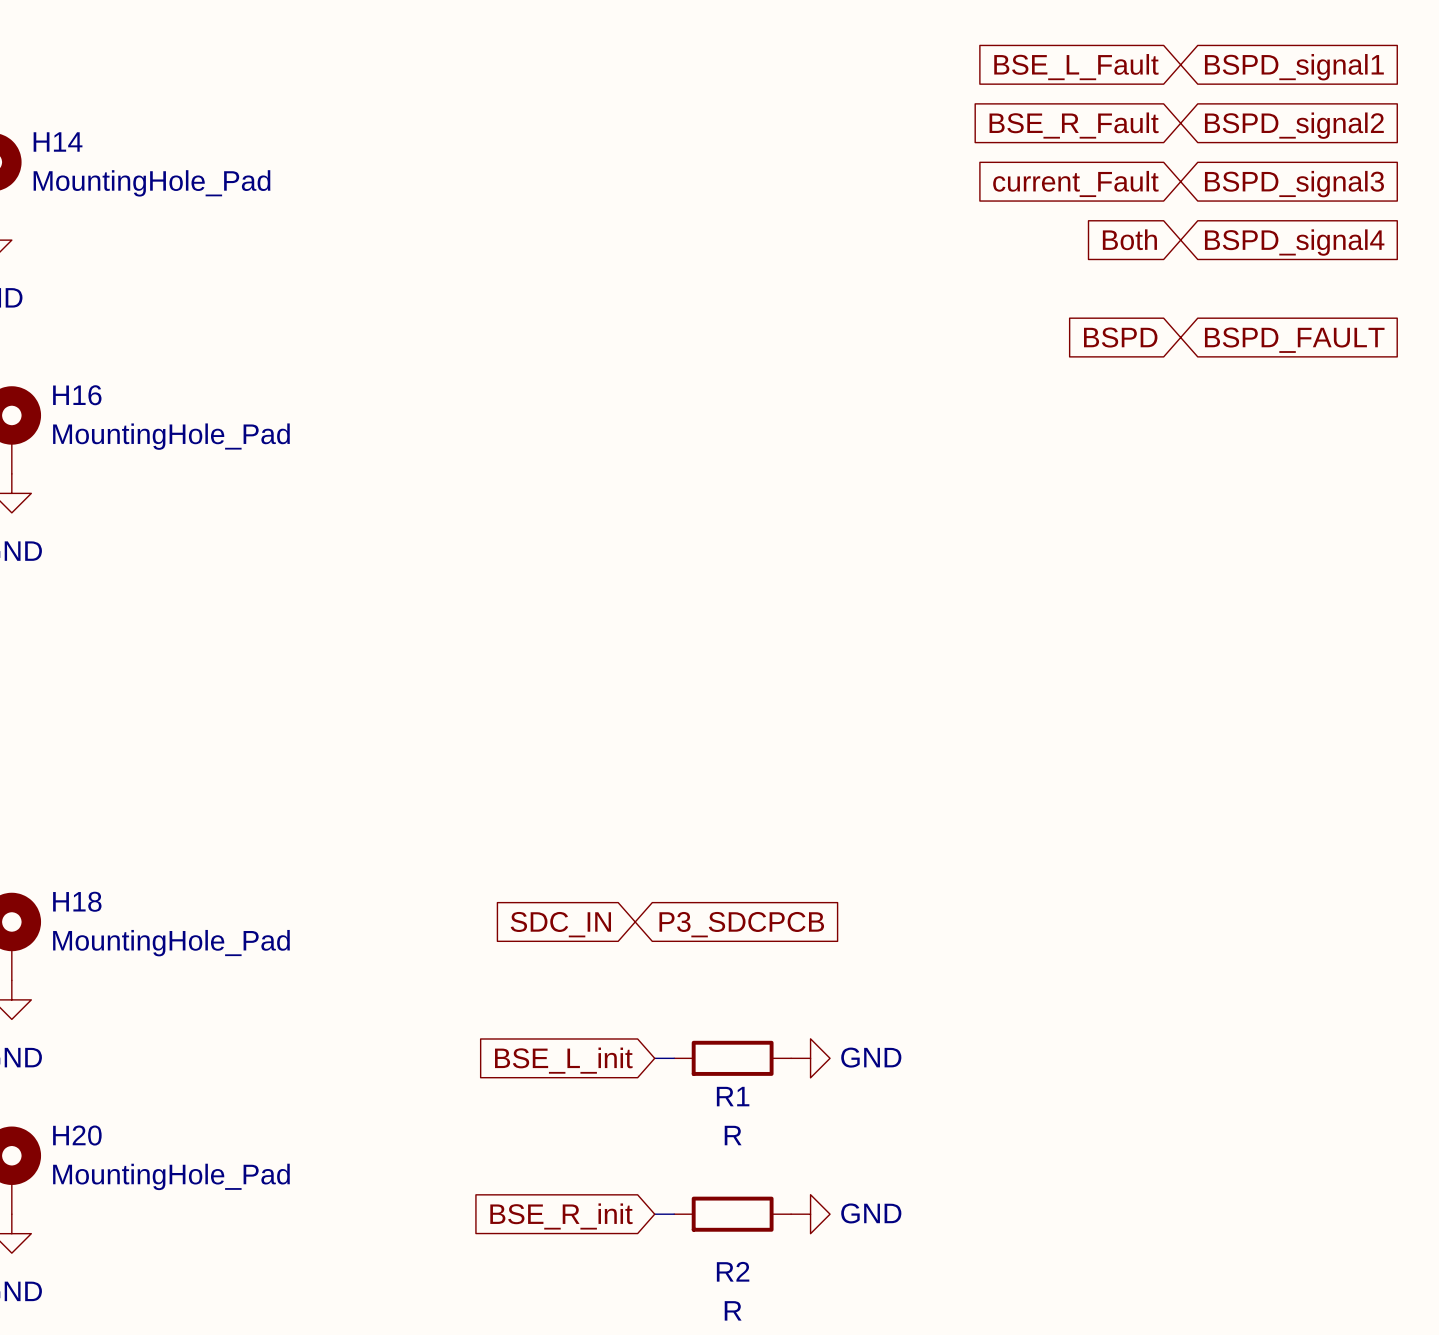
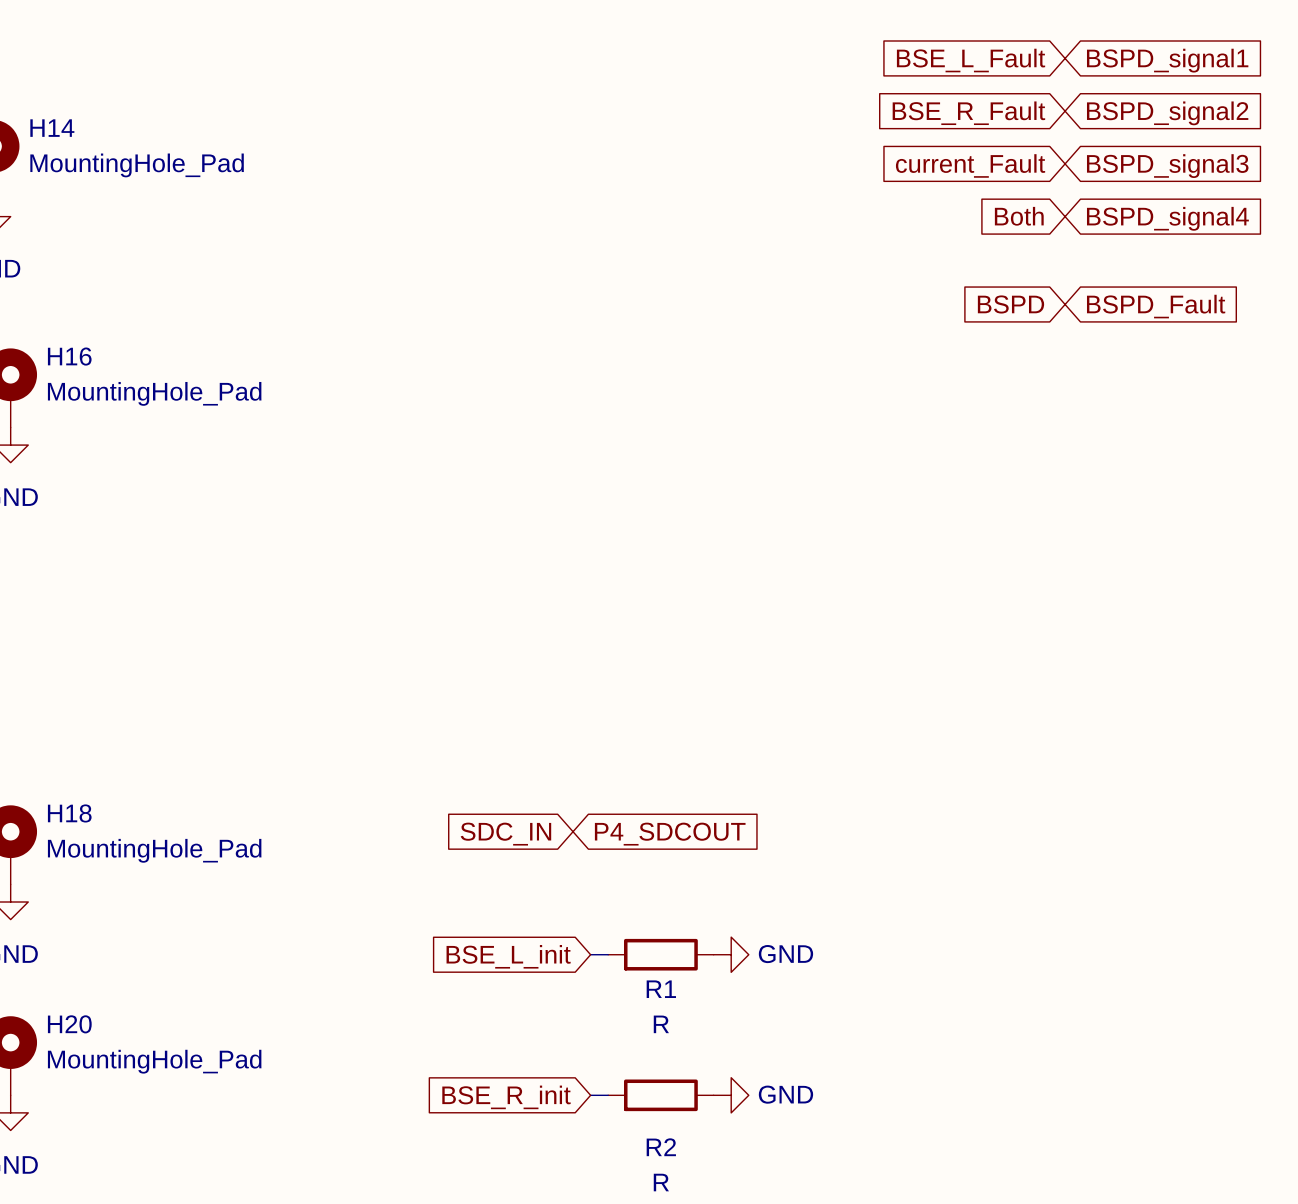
global label: BSPD_FAULT (1294, 340) -> BSPD_Fault (1156, 306)
global label: P3_SDCPCB (741, 924) -> P4_SDCOUT (670, 834)

